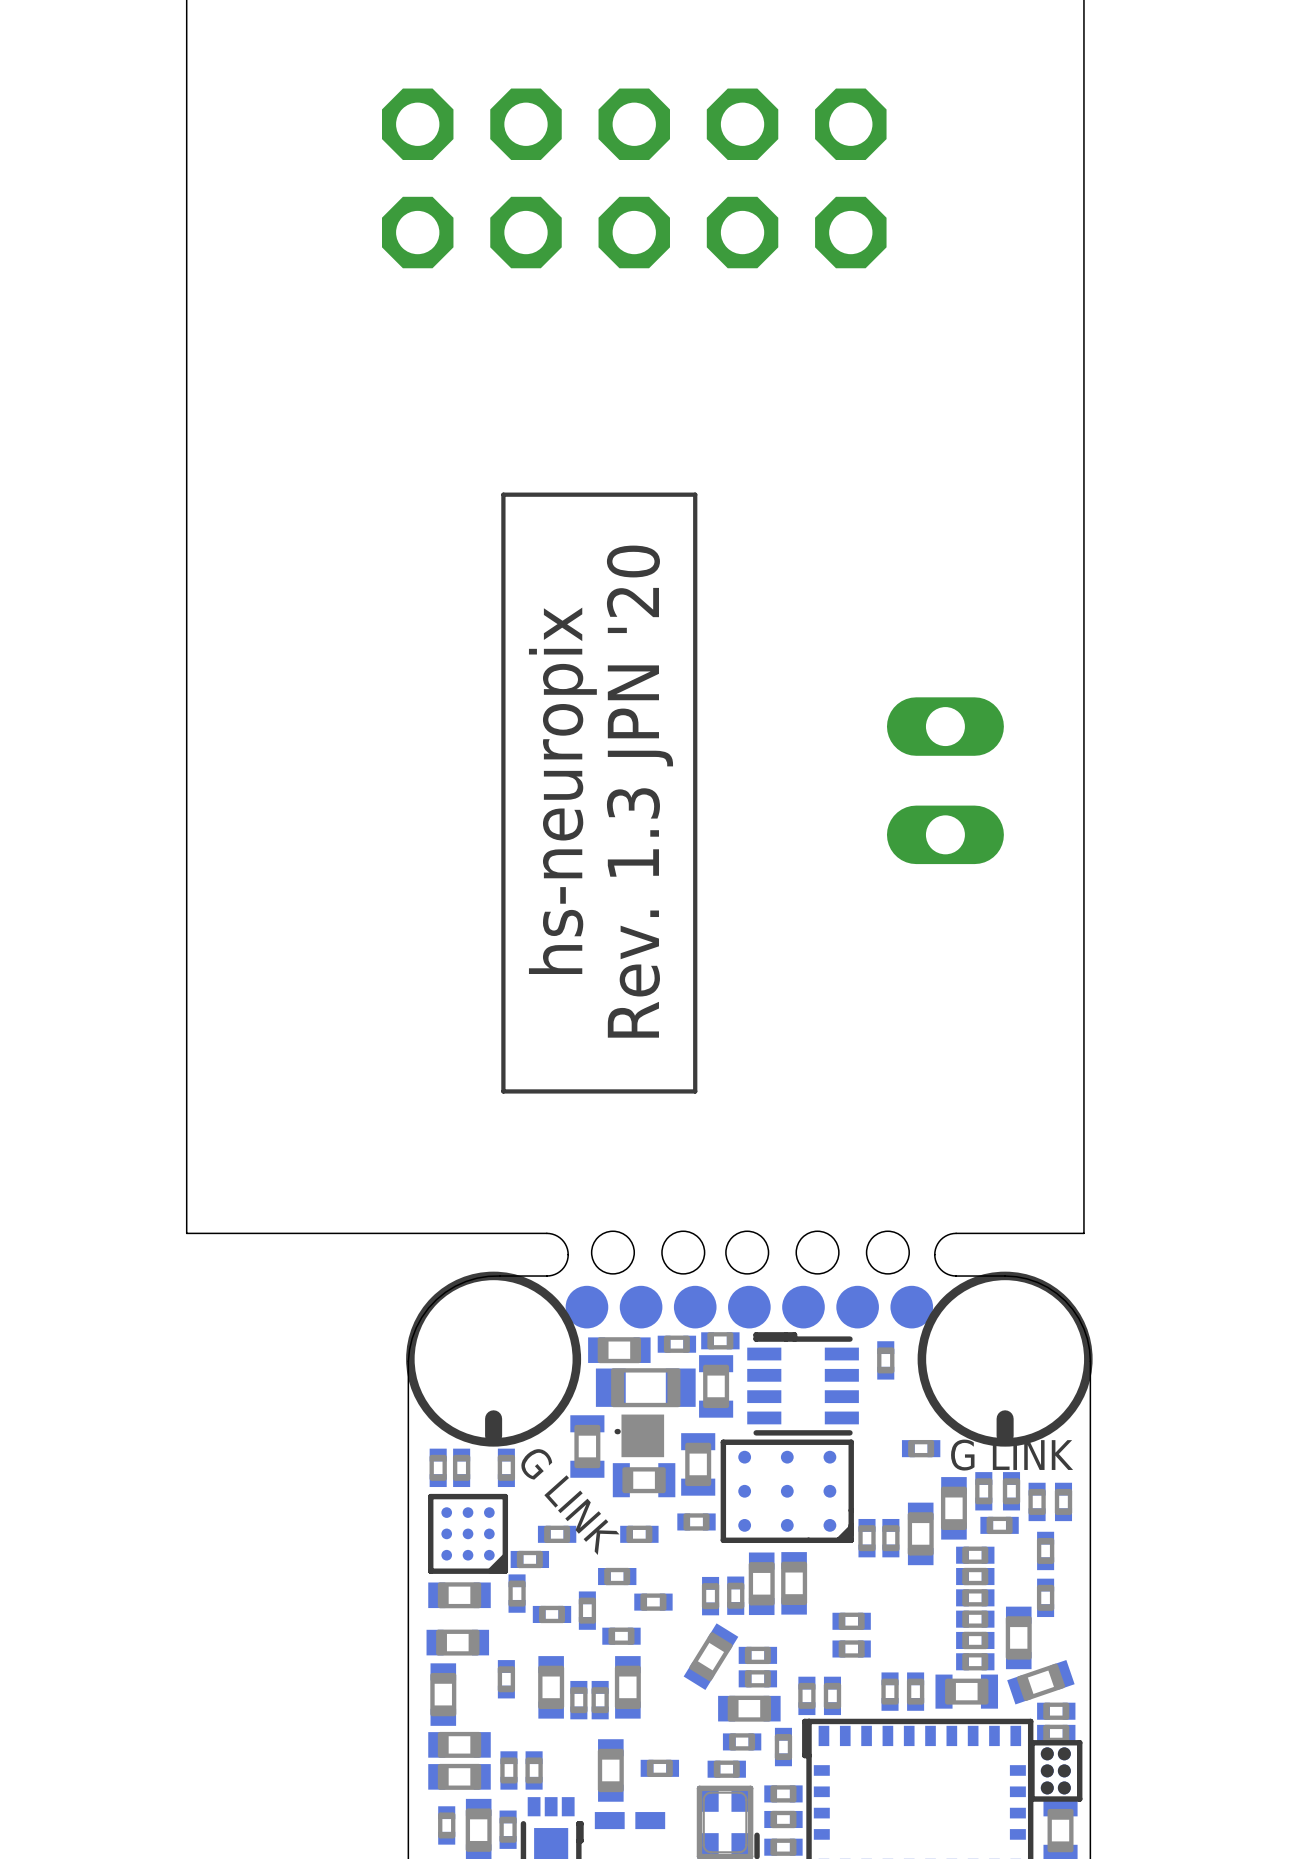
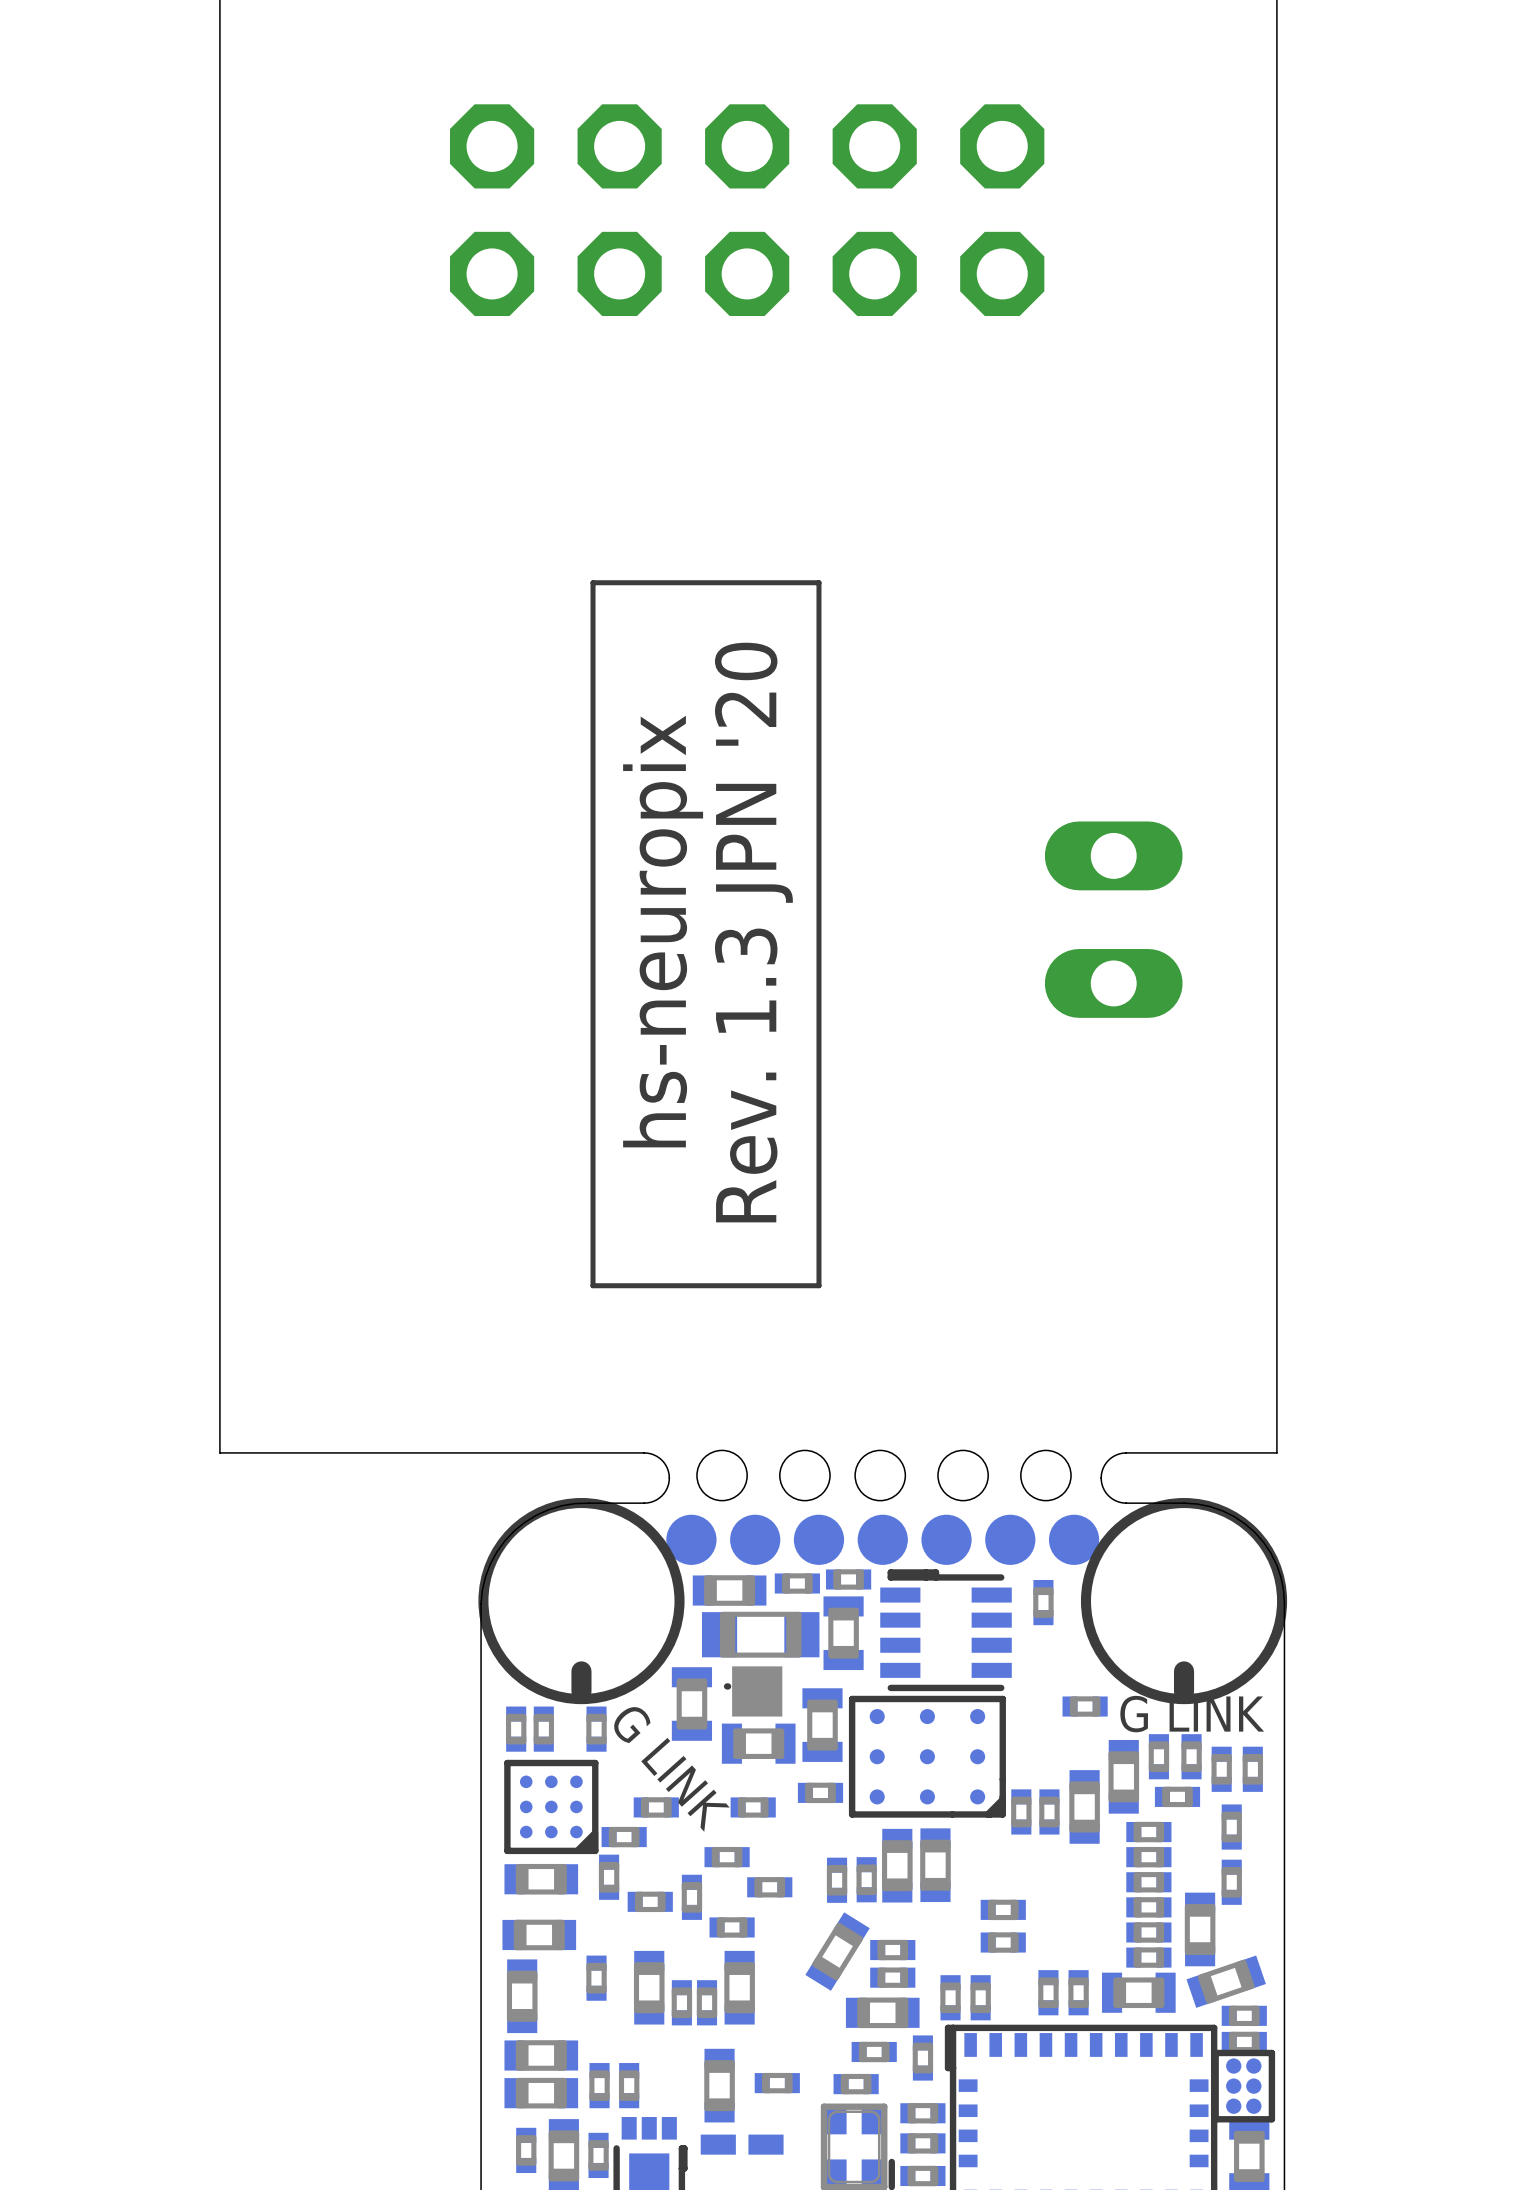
part footprint: [1029, 1740, 1083, 1802] -> [1212, 2049, 1276, 2123]

